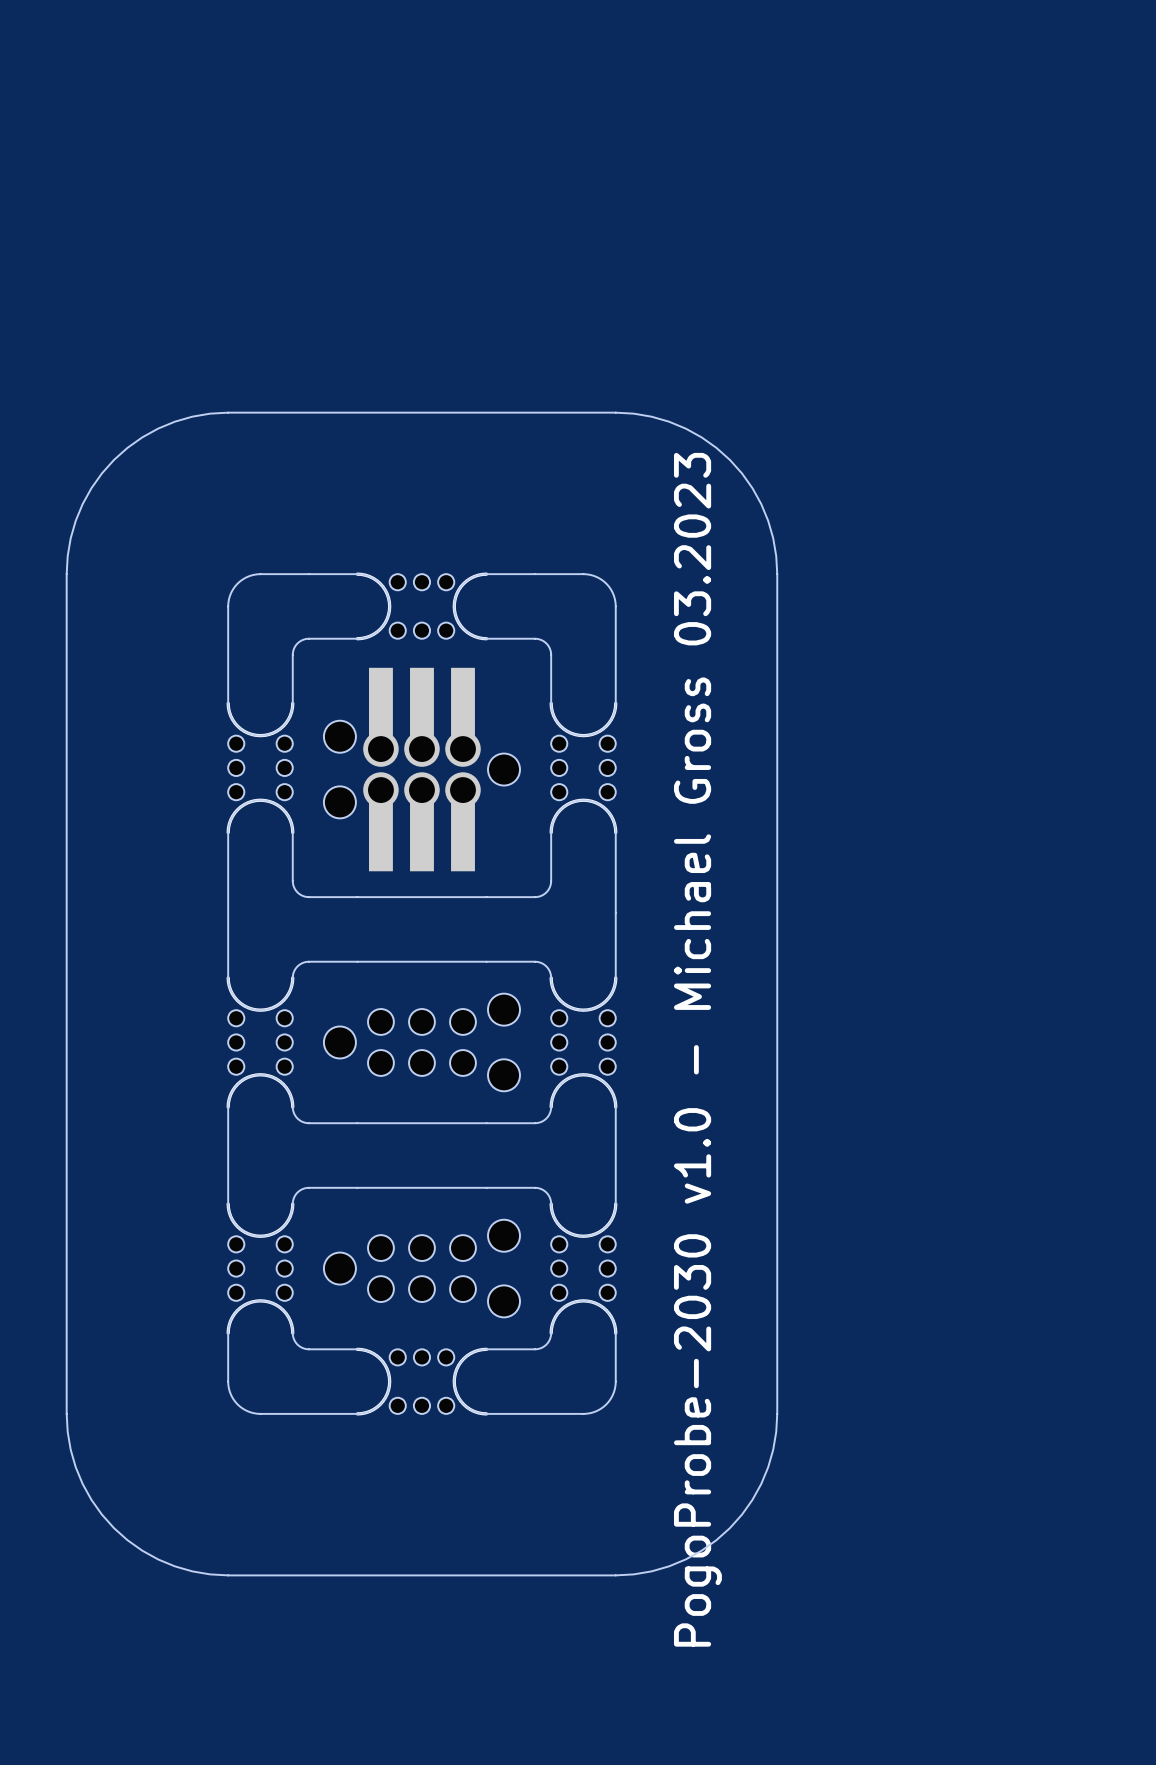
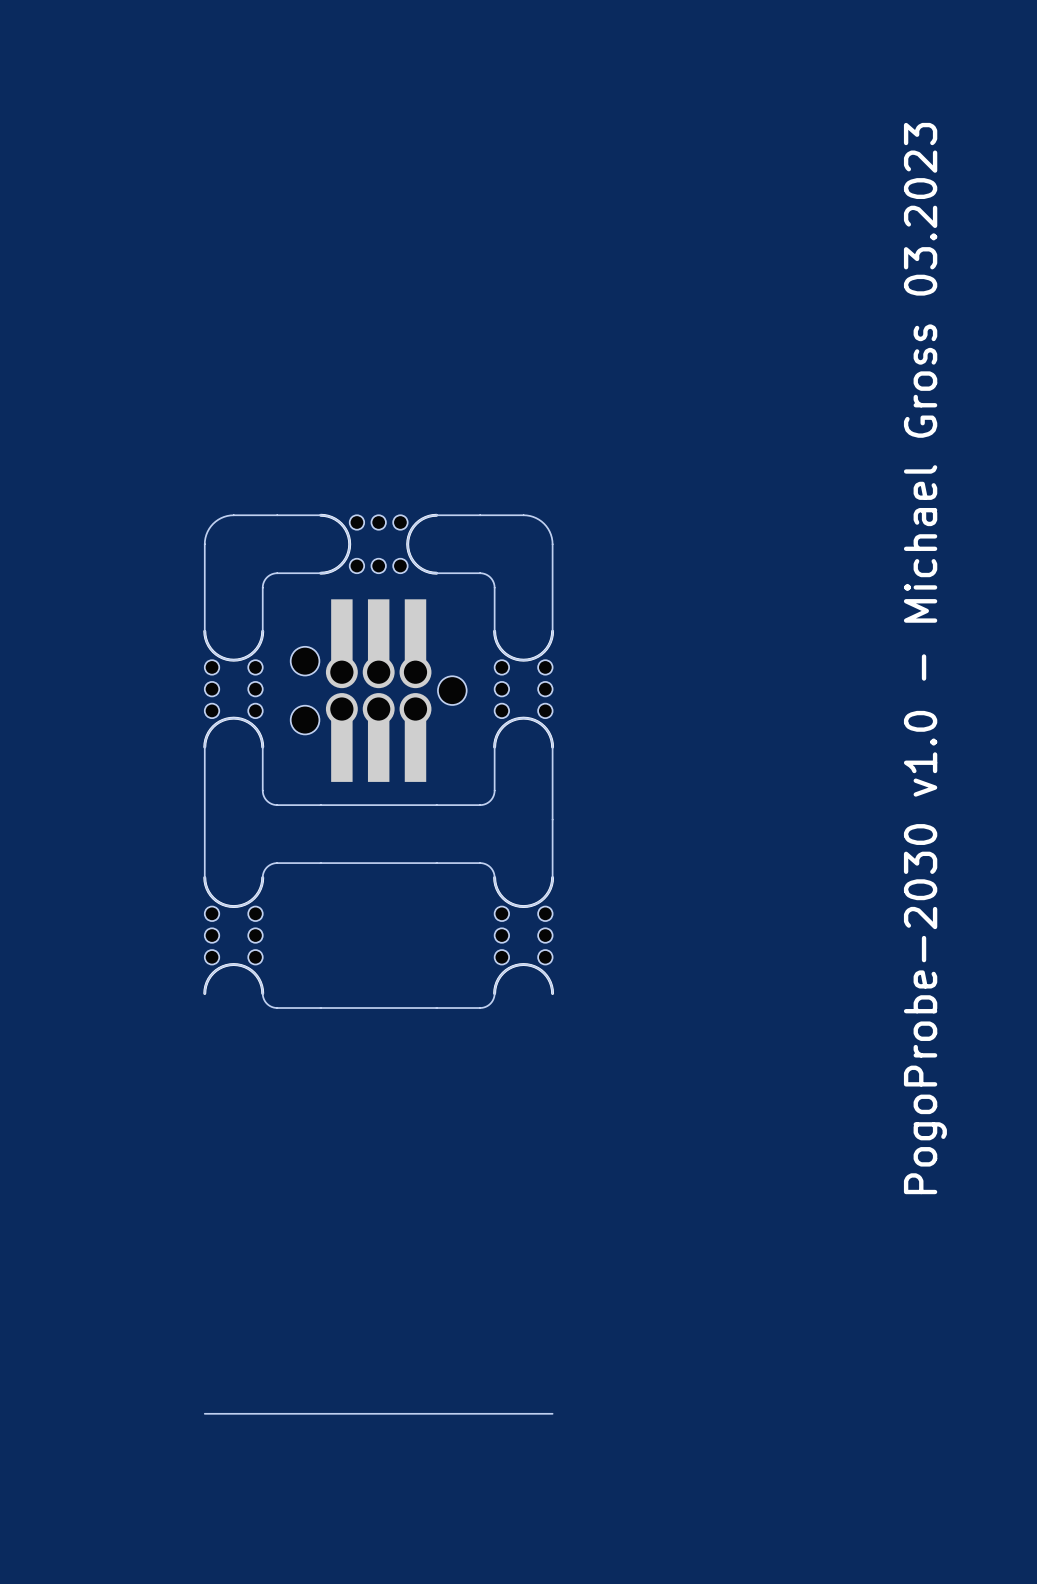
part: (421, 1042) -> none
text position: PogoProbe-2030 v1.0 - Michael Gross 03.2023 (697, 1049) -> PogoProbe-2030 v1.0 - Michael Gross 03.2023 (925, 658)
board edge: (228, 1107) (229, 1212) (232, 1220) (240, 1229) (252, 1235) (260, 1236) (272, 1233) (283, 1226) (290, 1216) (295, 1195) (301, 1189) (308, 1187) (537, 1187) (543, 1189) (549, 1195) (553, 1216) (563, 1229) (579, 1235) (595, 1233) (609, 1223) (615, 1208) (615, 1107) -> none
part: (260, 1268) -> none
part: (421, 1268) -> none
part: (583, 1268) -> none
board edge: (228, 1333) (228, 1388) (235, 1401) (249, 1412) (260, 1413) (361, 1413) (375, 1408) (387, 1393) (389, 1381) (387, 1370) (375, 1355) (361, 1349) (308, 1349) (300, 1347) (294, 1339) (288, 1317) (280, 1307) (272, 1303) (256, 1301) (240, 1307) (230, 1320) (228, 1333) -> none
board edge: (551, 1333) (553, 1320) (557, 1313) (563, 1307) (575, 1301) (591, 1301) (603, 1307) (609, 1313) (615, 1328) (615, 1385) (612, 1395) (603, 1406) (587, 1413) (486, 1413) (471, 1410) (459, 1399) (455, 1389) (454, 1377) (459, 1363) (468, 1355) (482, 1349) (539, 1348) (547, 1342) (551, 1333) -> none
part: (421, 1381) -> none
board edge: (228, 1575) (192, 1571) (158, 1559) (142, 1550) (113, 1528) (91, 1499) (75, 1467) (67, 1431) (66, 1413) (67, 556) (75, 520) (91, 488) (113, 459) (127, 447) (158, 428) (174, 421) (210, 413) (228, 412) (615, 412) (651, 416) (685, 428) (716, 447) (729, 459) (752, 488) (768, 520) (773, 538) (777, 574) (776, 1431) (768, 1467) (761, 1483) (742, 1514) (716, 1540) (685, 1559) (669, 1566) (633, 1574) (615, 1575) -> none

